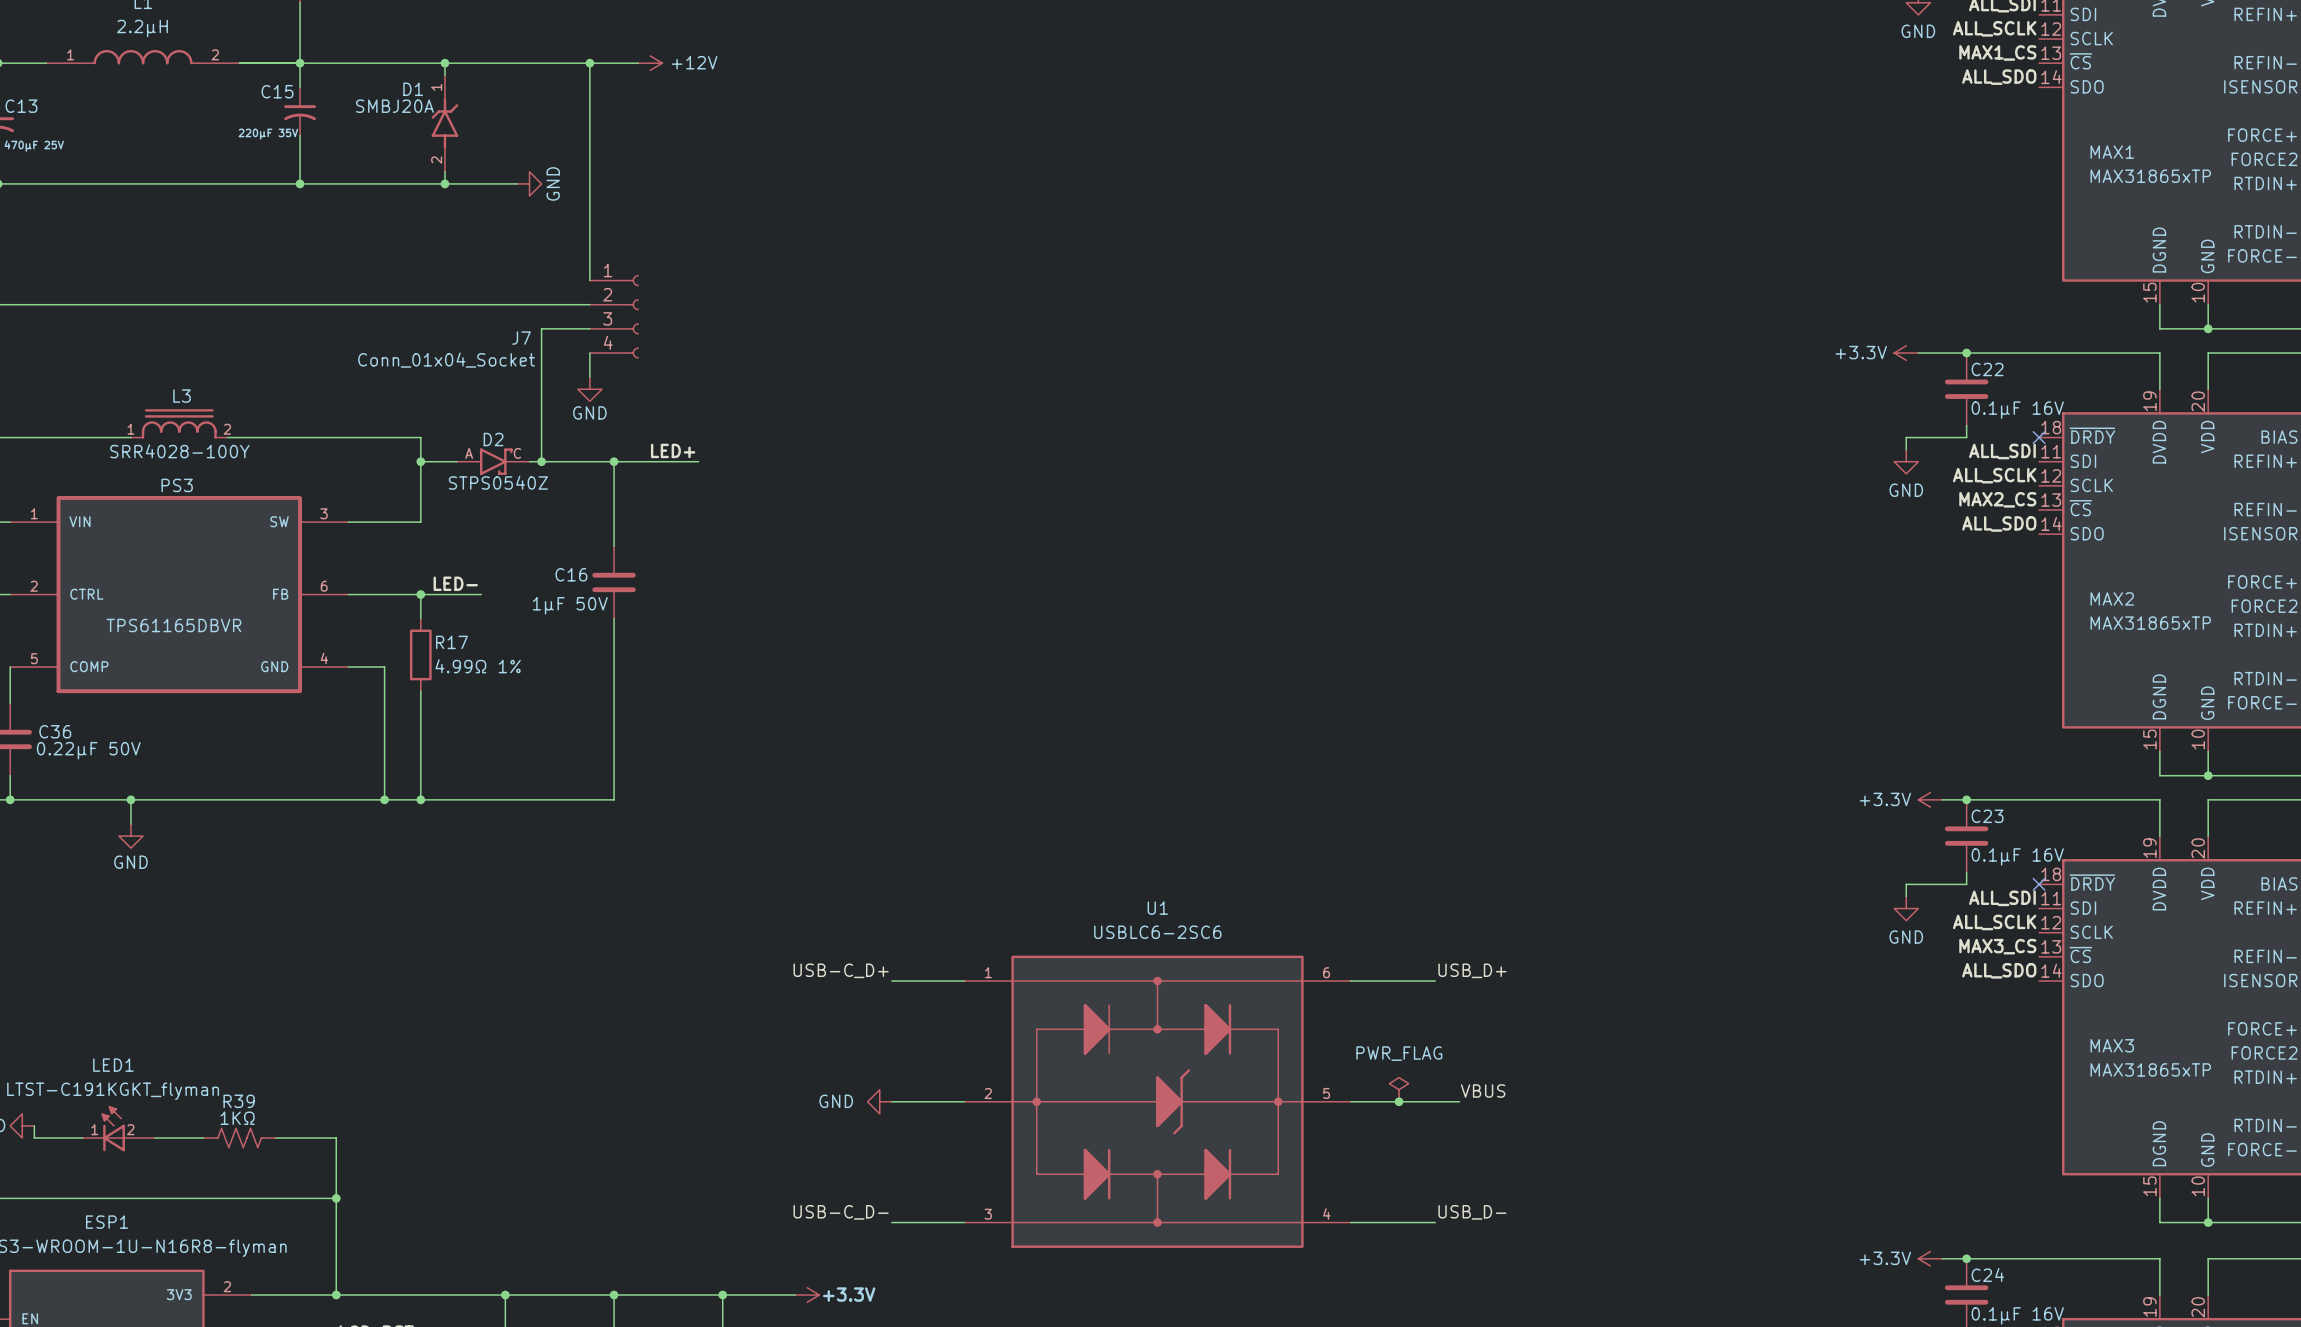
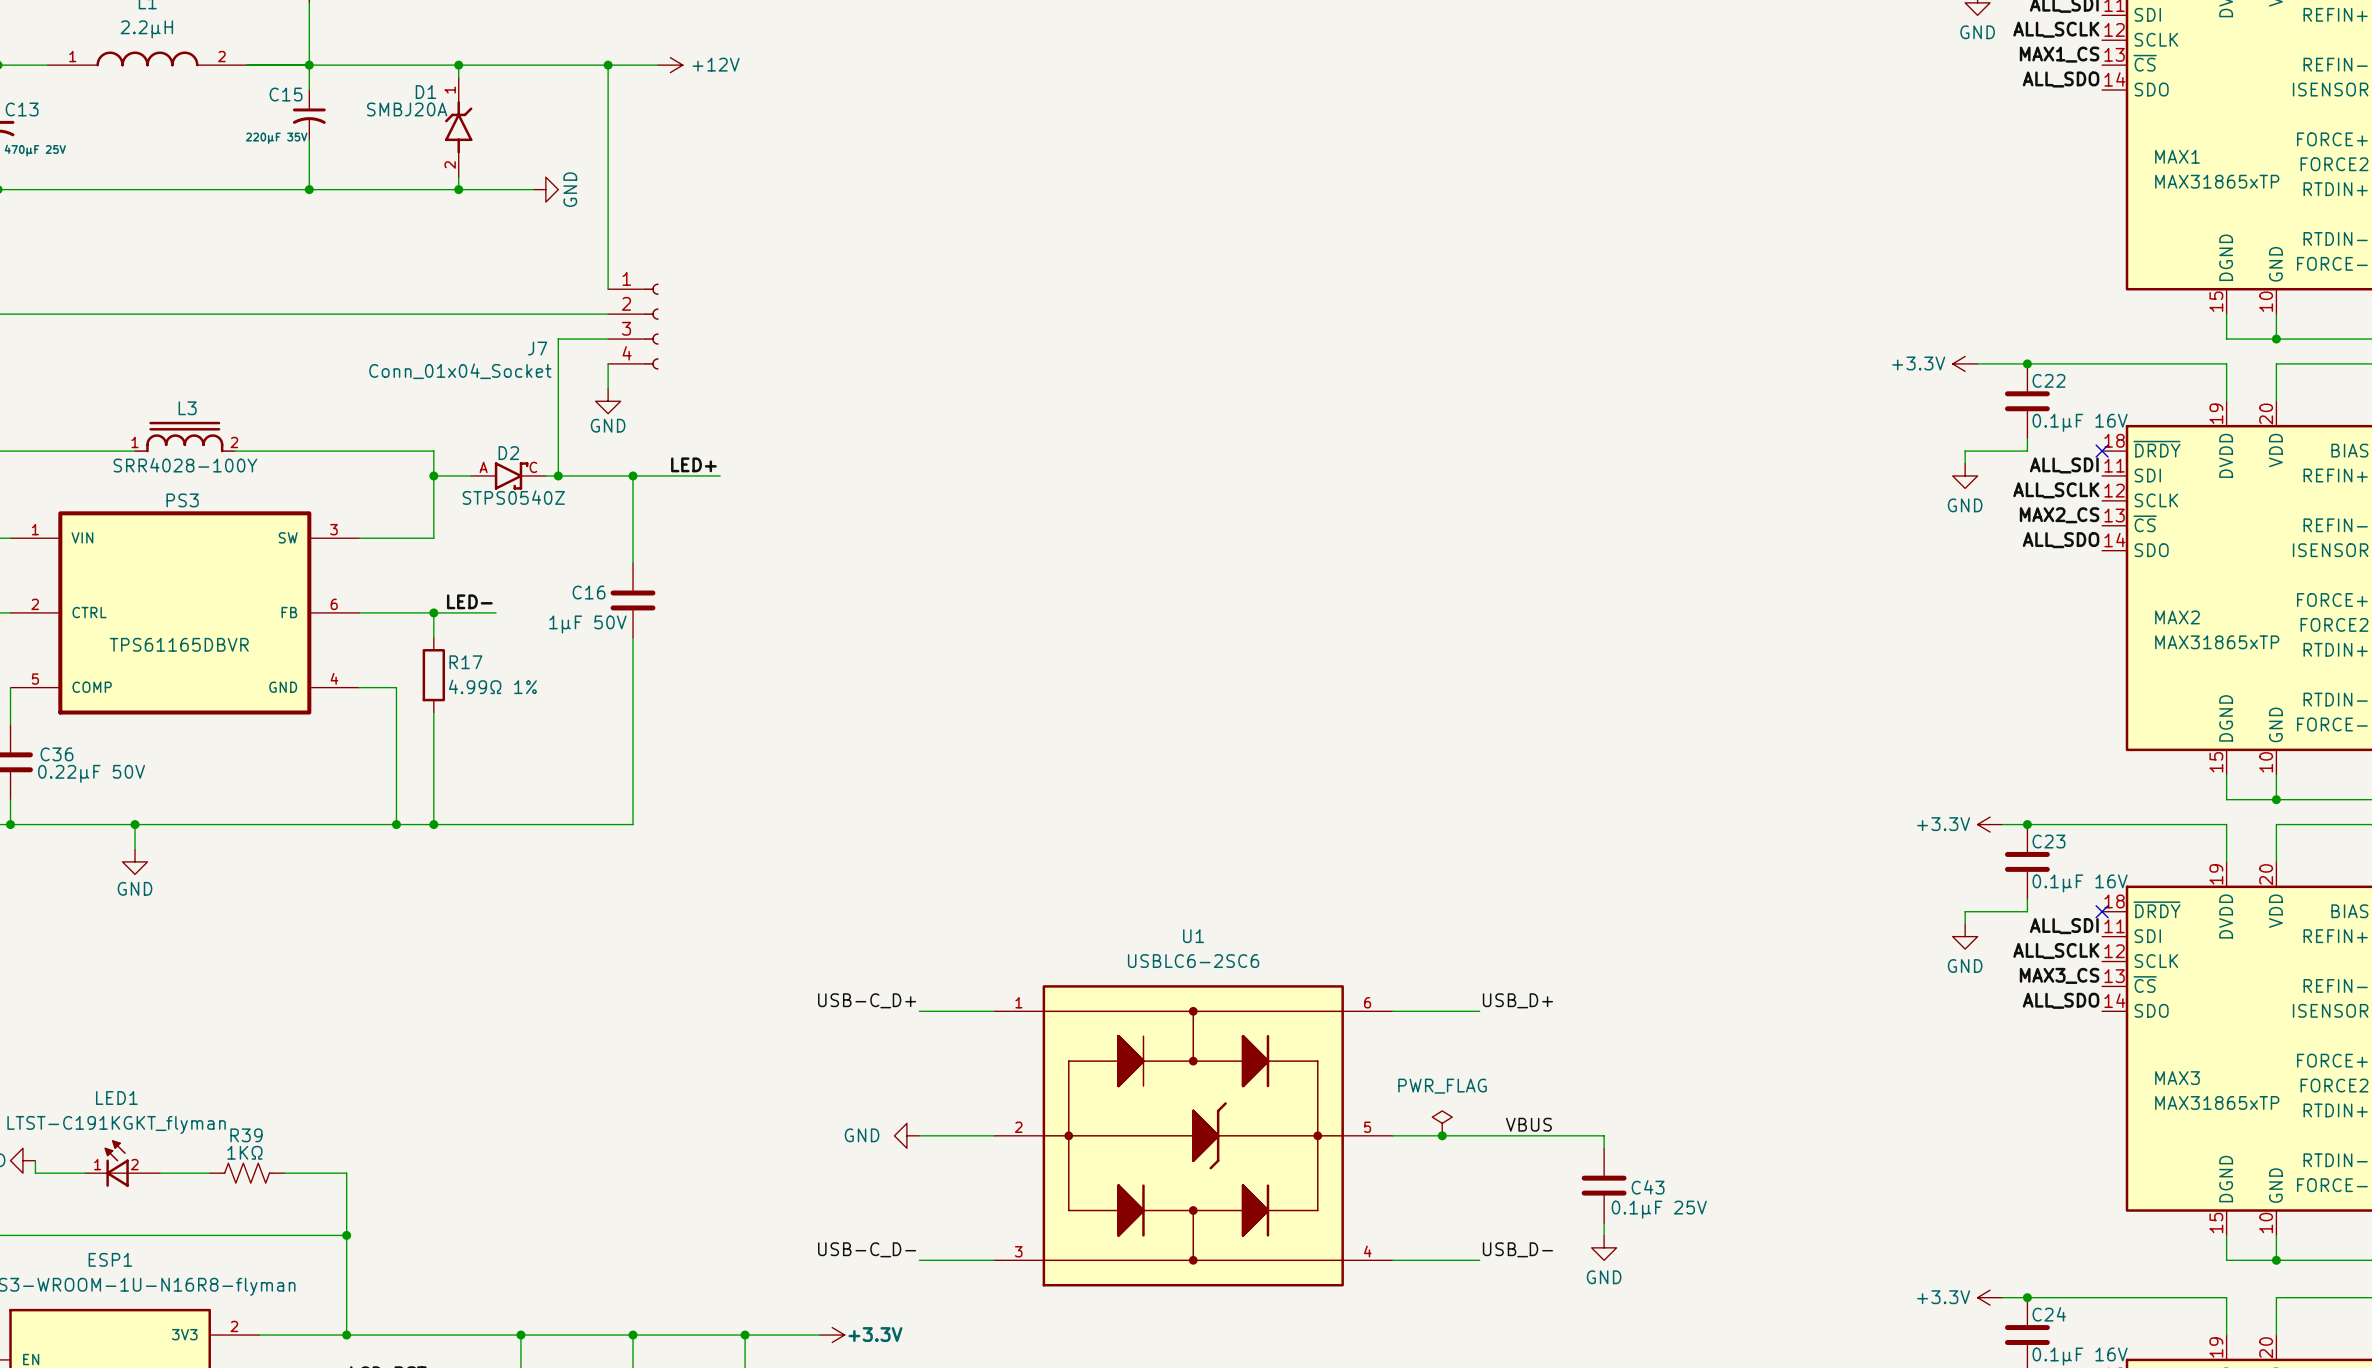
wire: none -> (1504, 1135) (1604, 1135) (1604, 1148)
C43: none -> 0.1µF 25V (1604, 1185)
wire: none -> (1604, 1222) (1604, 1235)
power symbol: none -> GND (1604, 1247)

